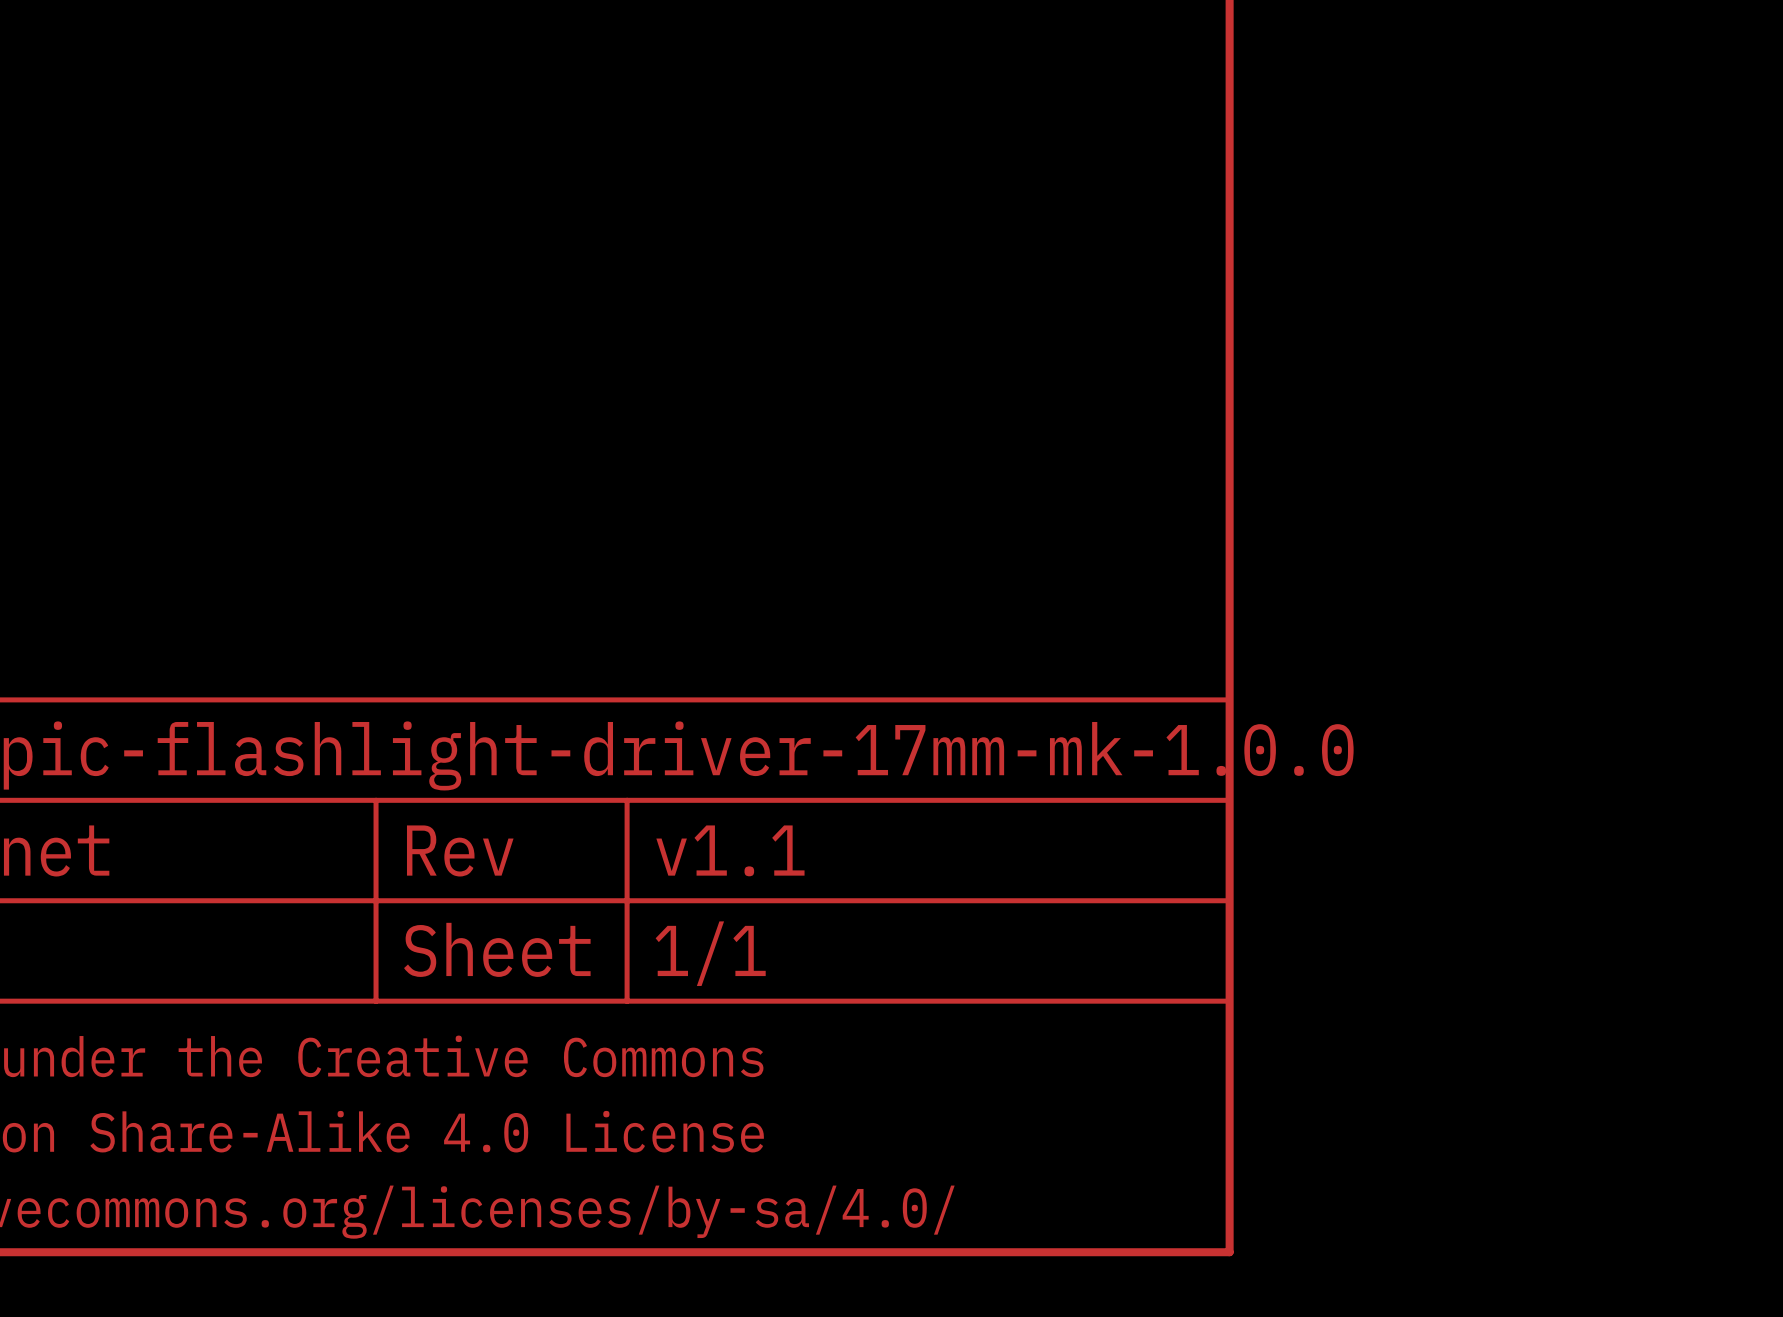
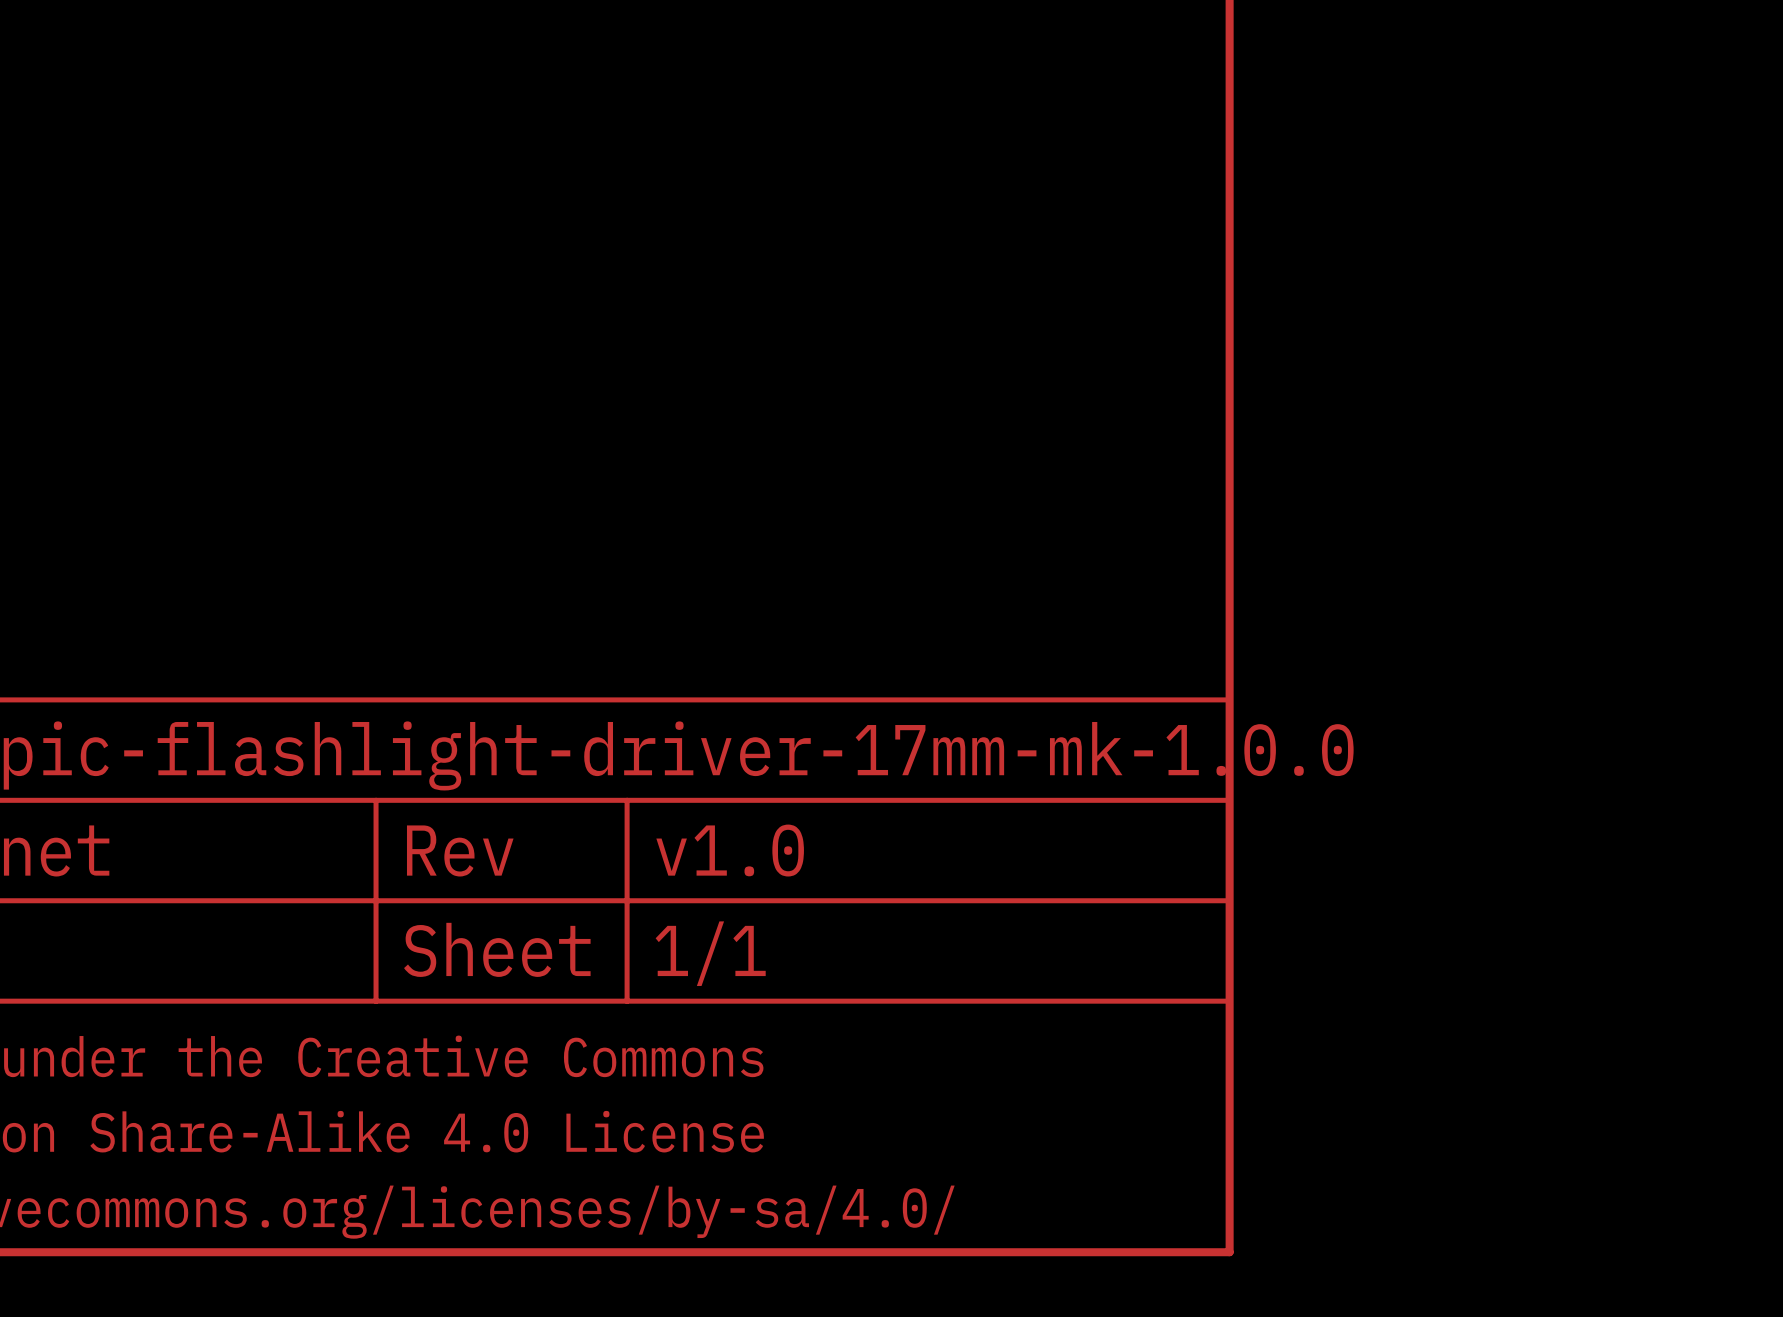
part text: v1.1 (730, 850) -> v1.0 (730, 850)

